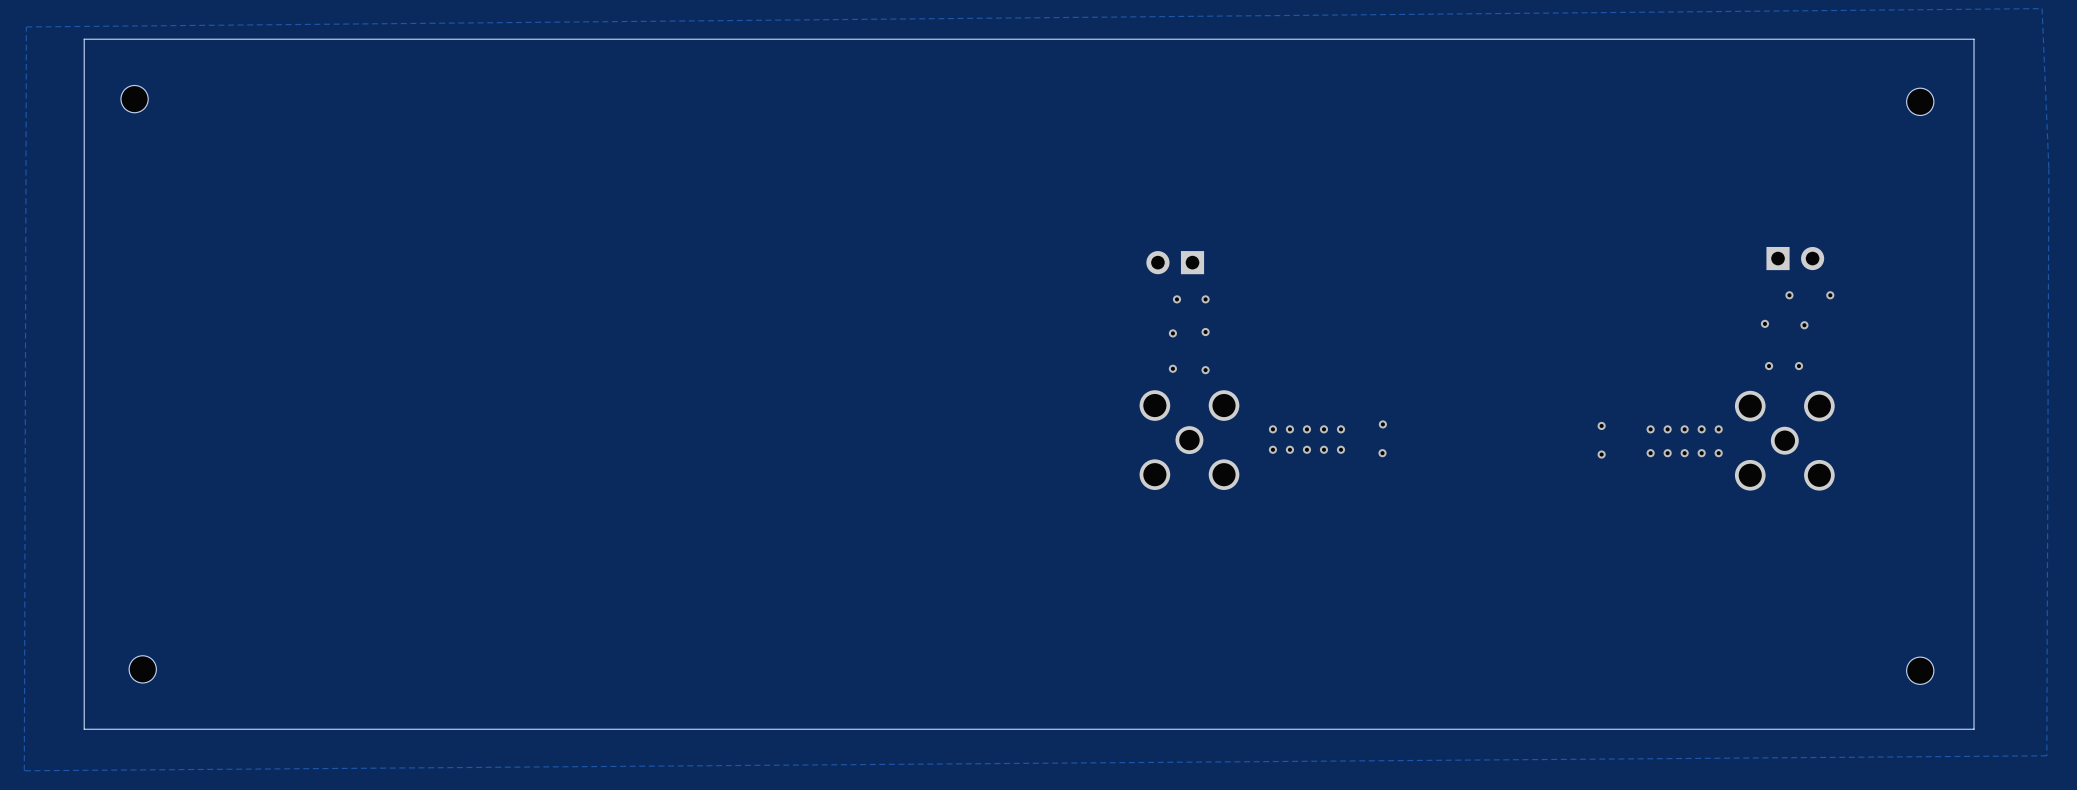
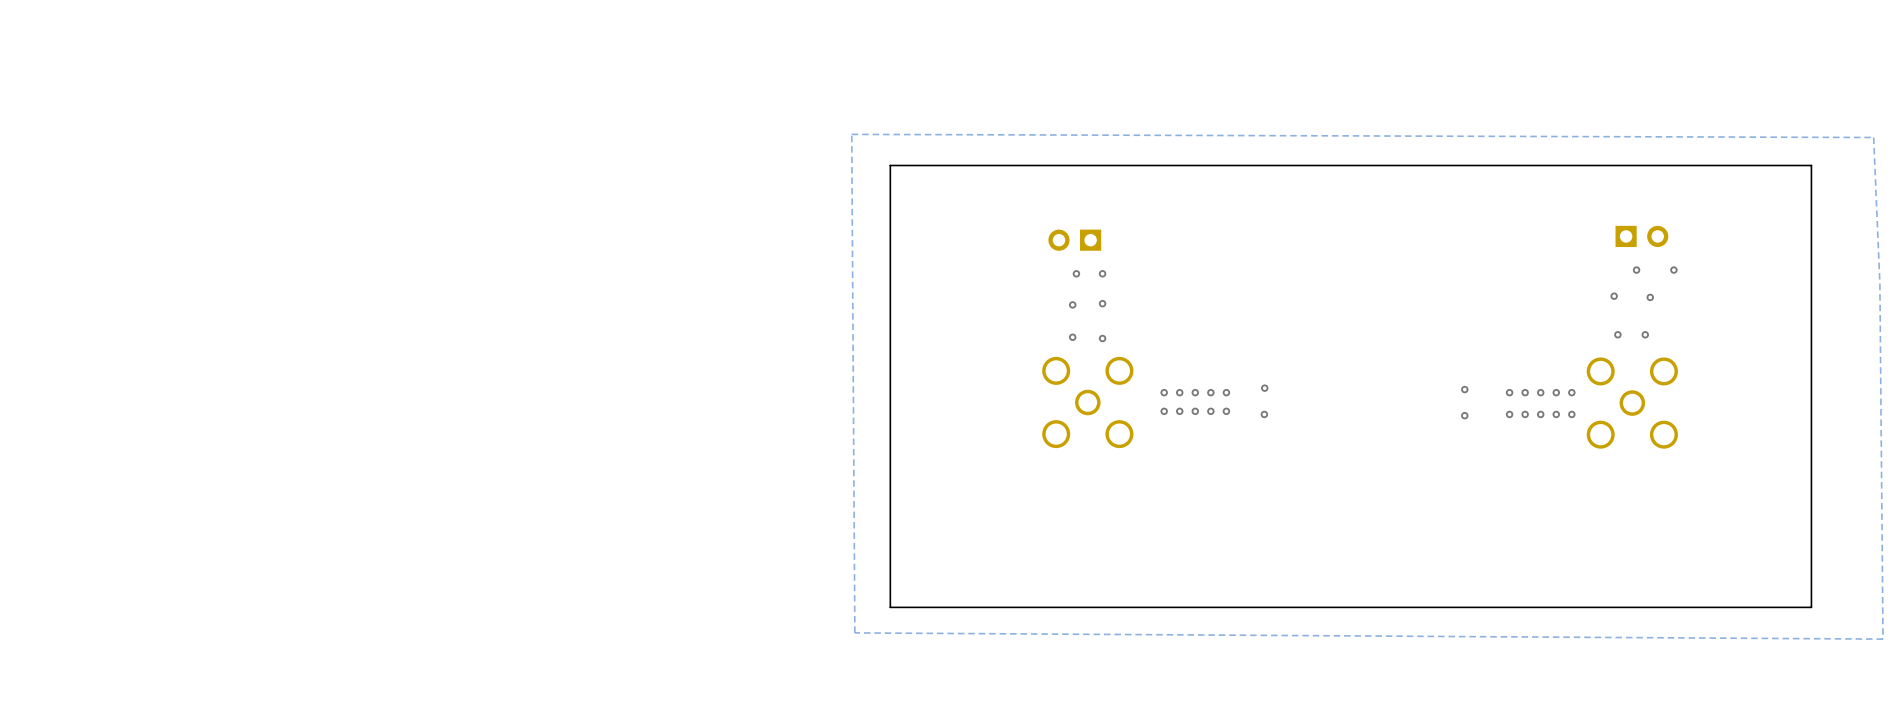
zone outline: (2042, 8) (26, 26) (24, 770) (2046, 755) (2048, 168) (2042, 8) -> none
board edge: (1974, 39) (84, 39) (84, 729) (1974, 729) (1974, 39) -> none
part: (134, 99) -> none
part: (1920, 101) -> none
zone outline: none -> (851, 134) (854, 632) (1883, 639) (1879, 283) (1873, 137) (851, 134)
board edge: none -> (1811, 165) (890, 165) (890, 607) (1811, 607) (1811, 165)
part: (142, 669) -> none
part: (1920, 670) -> none

